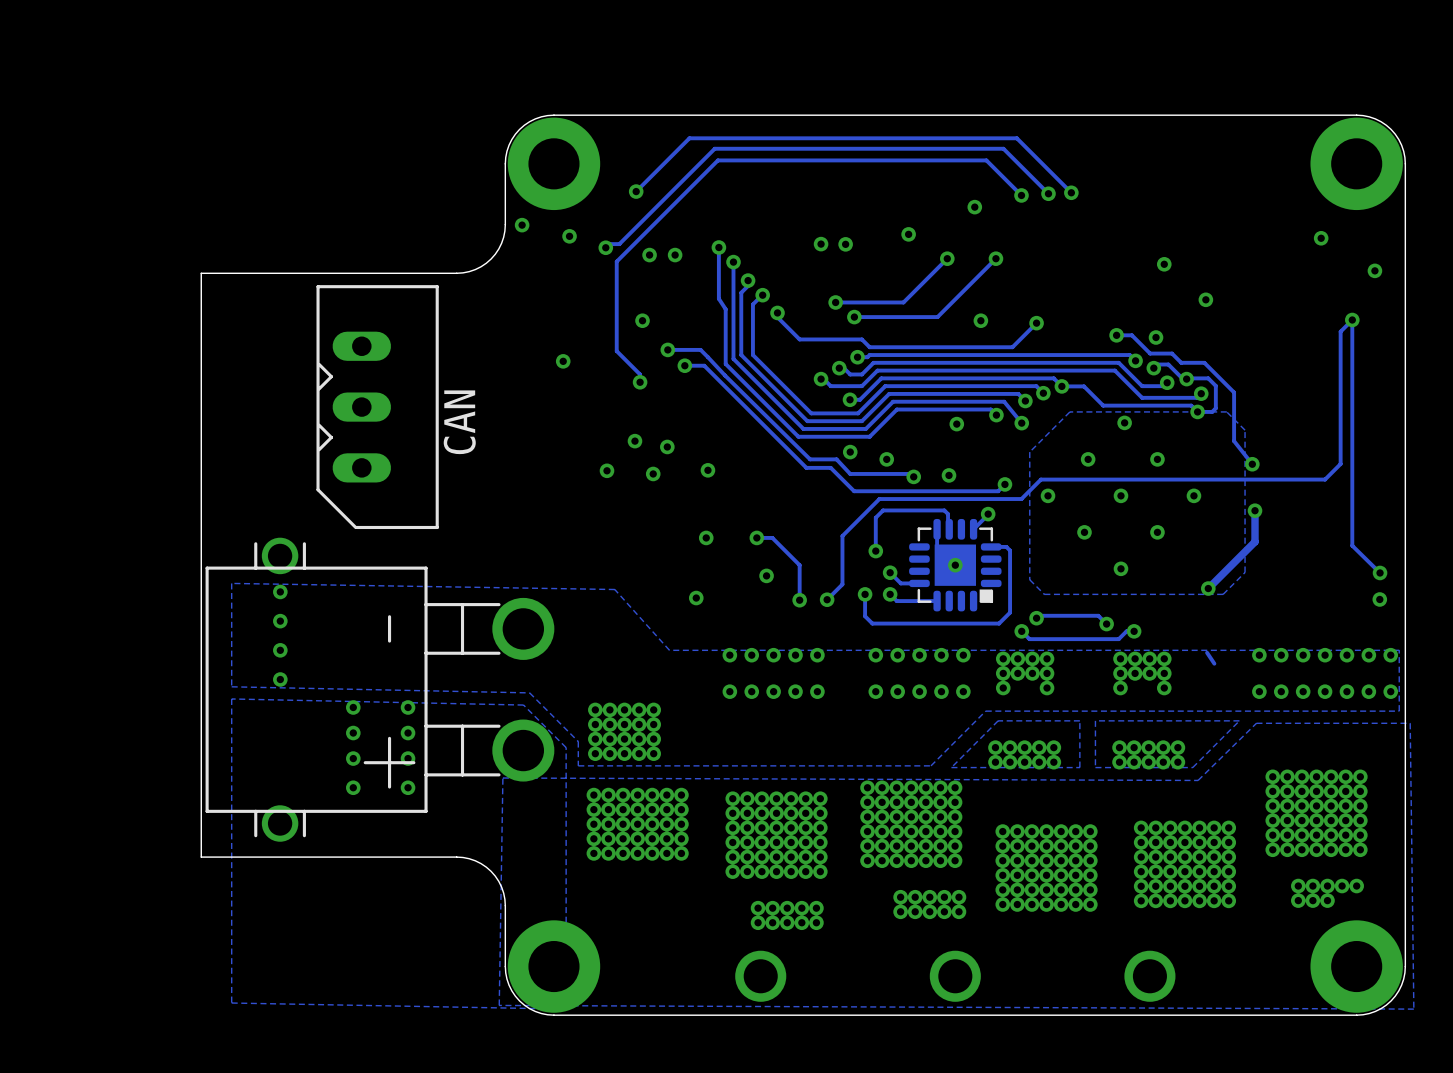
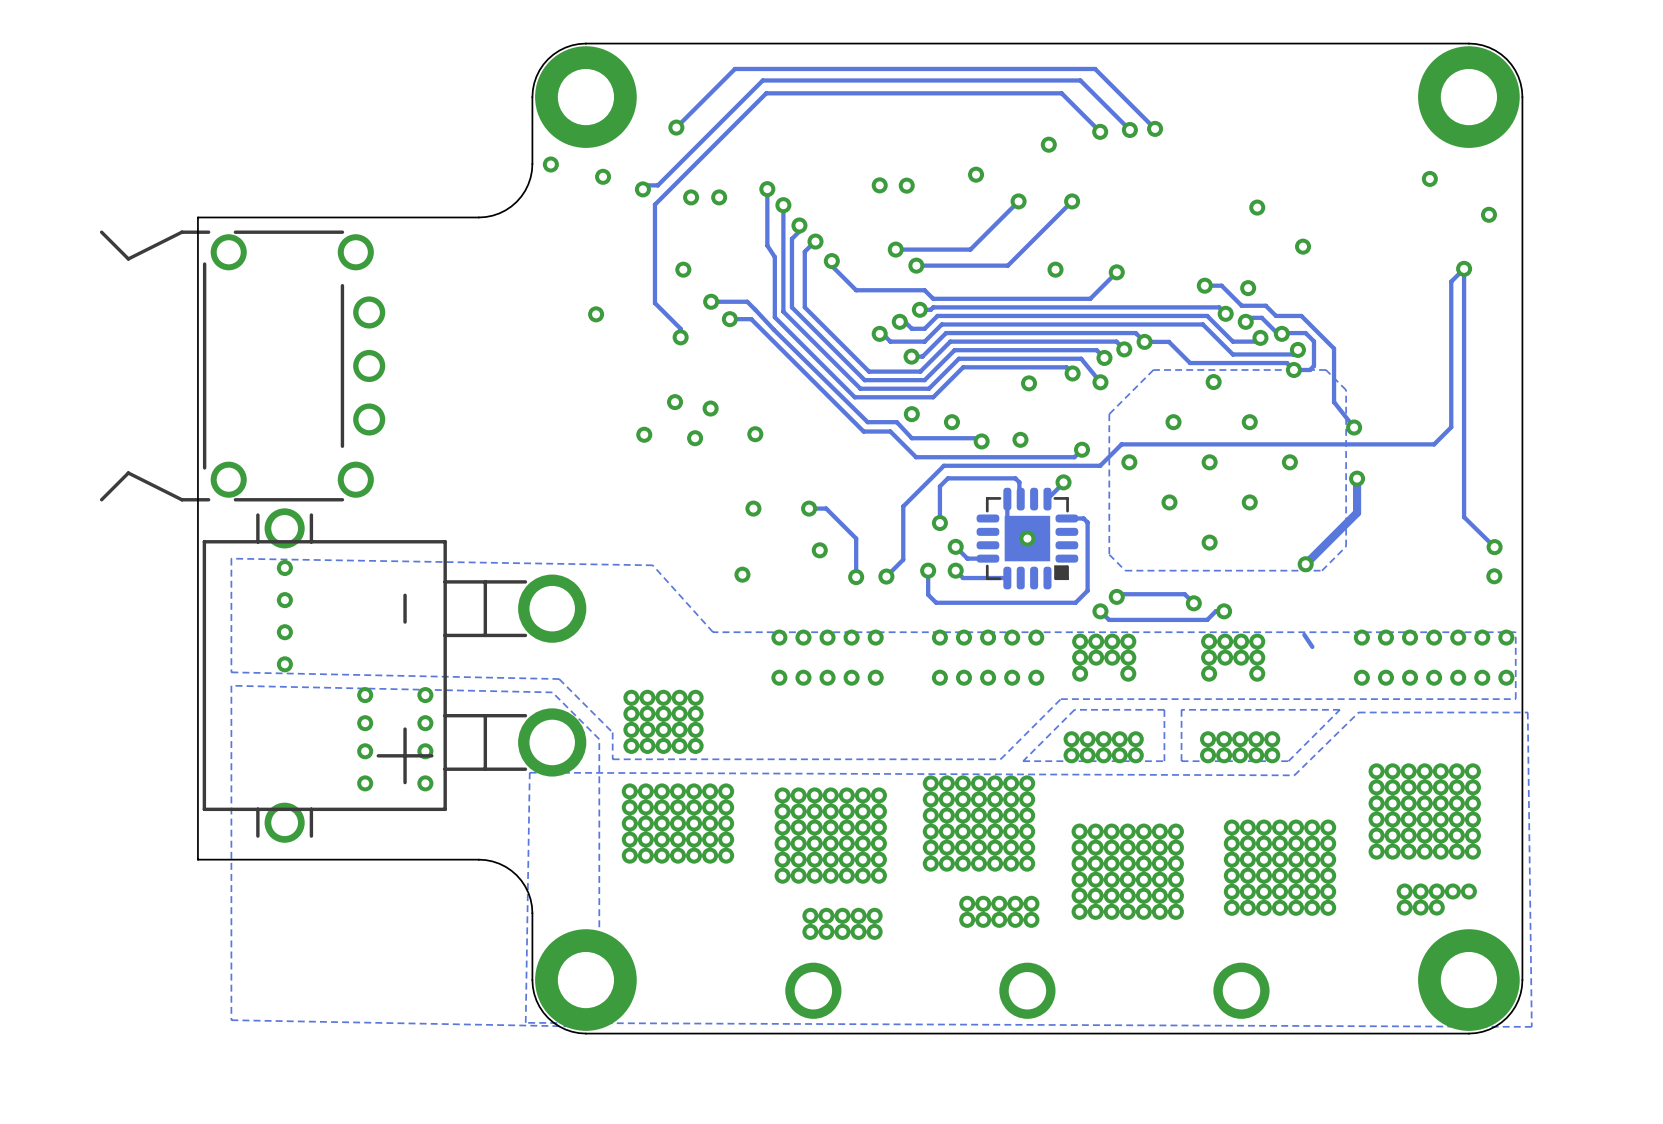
CAN: (377, 407) -> none
part: none -> (242, 365)

